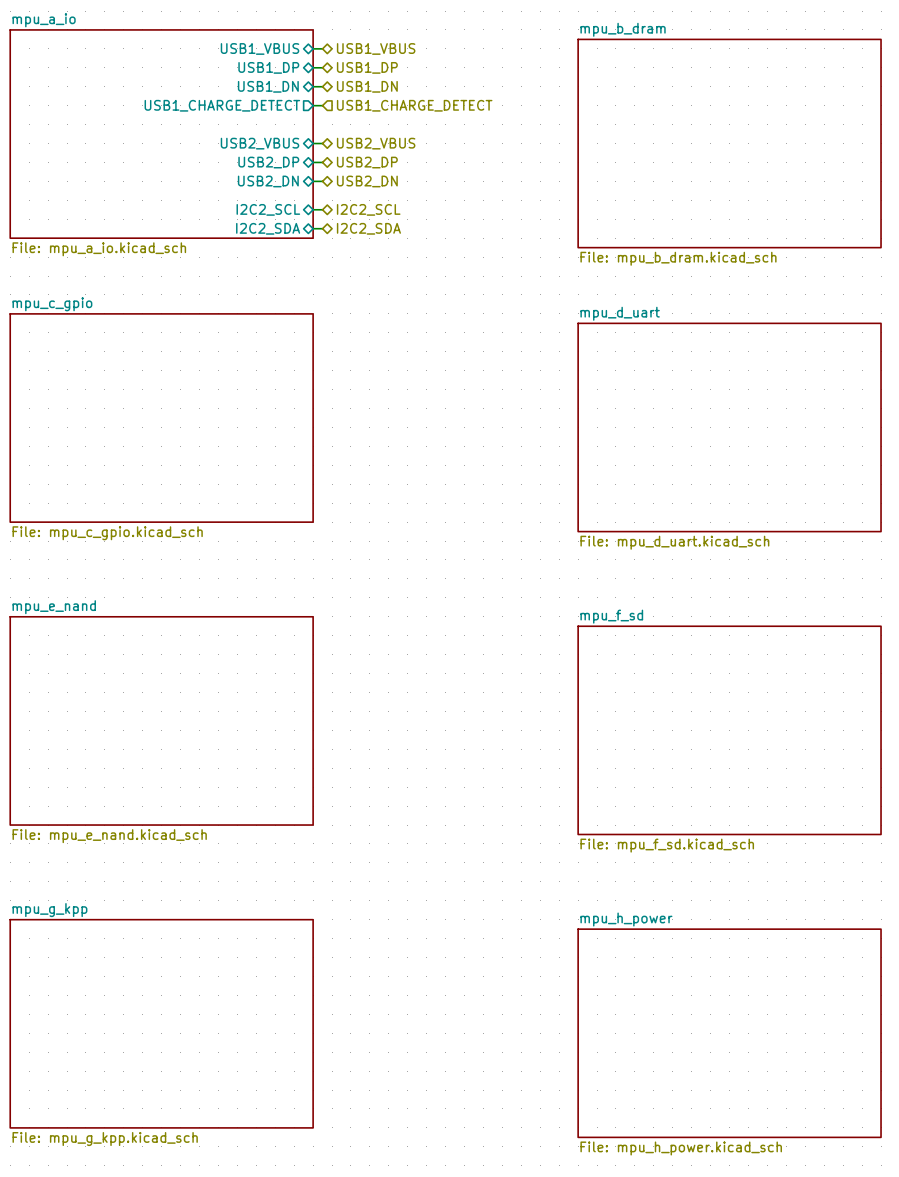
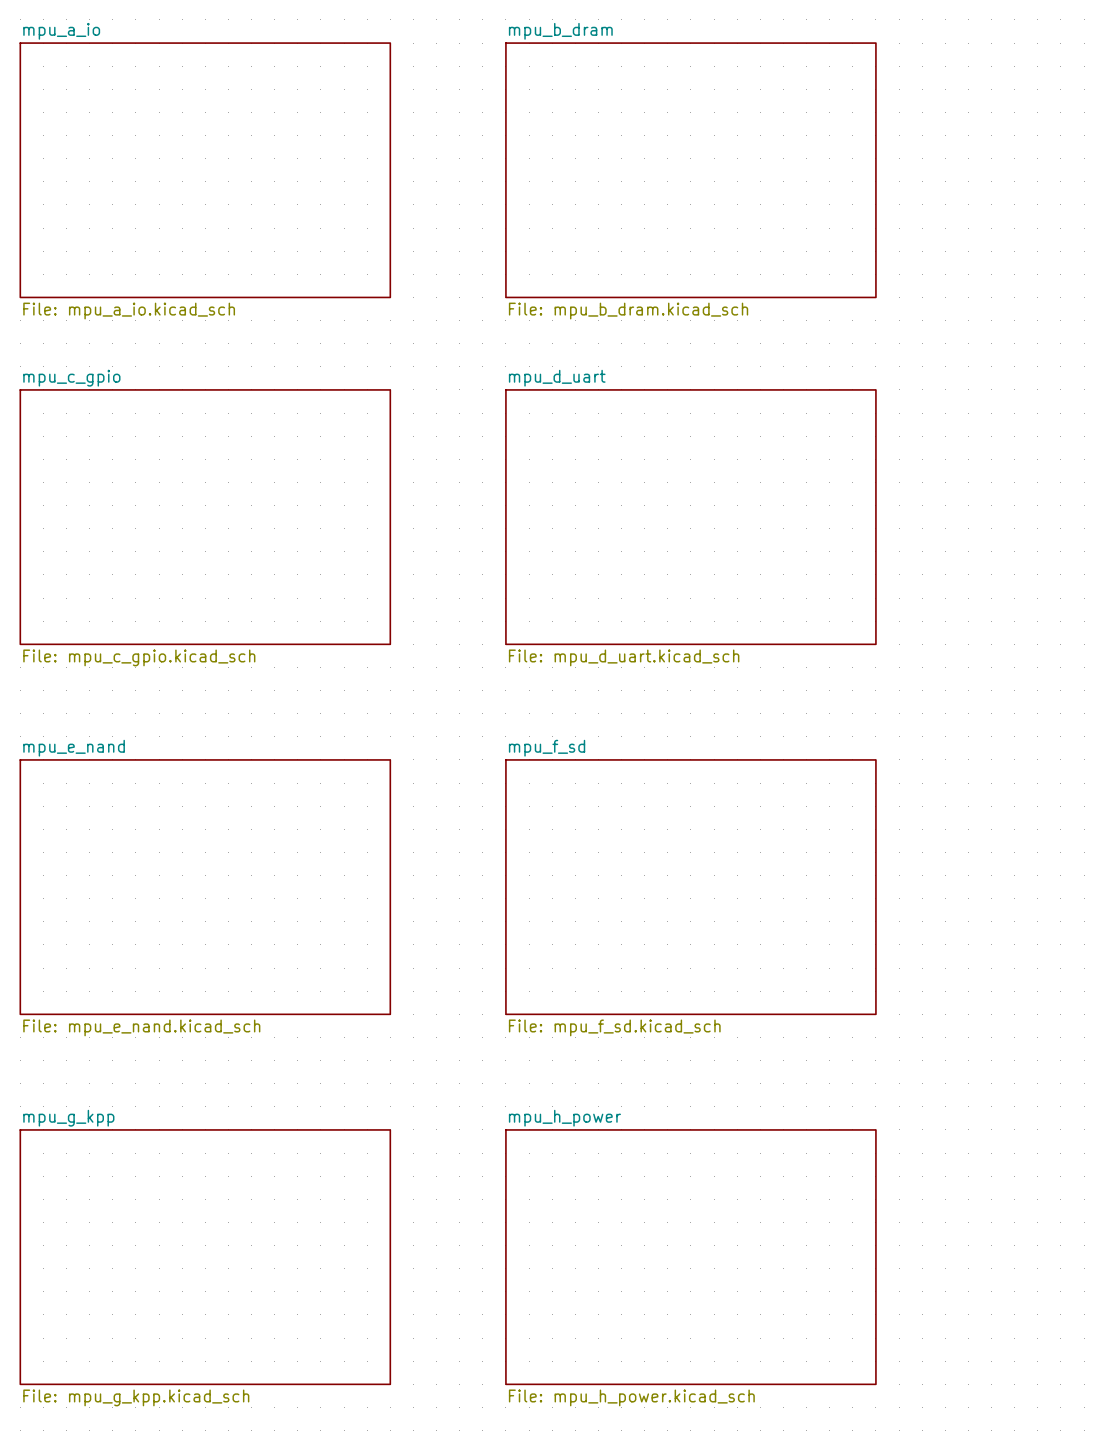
sheet pin: USB1_VBUS (260, 48) -> none
wire: (313, 48) (322, 48) -> none
hierarchical label: USB1_VBUS (376, 48) -> none
sheet pin: USB1_DP (268, 67) -> none
wire: (313, 67) (322, 67) -> none
hierarchical label: USB1_DP (367, 67) -> none
sheet pin: USB1_DN (268, 86) -> none
wire: (313, 86) (322, 86) -> none
hierarchical label: USB1_DN (367, 86) -> none
sheet pin: USB1_CHARGE_DETECT (222, 105) -> none
wire: (313, 105) (322, 105) -> none
hierarchical label: USB1_CHARGE_DETECT (414, 105) -> none
sheet pin: USB2_VBUS (260, 143) -> none
wire: (313, 143) (322, 143) -> none
hierarchical label: USB2_VBUS (376, 143) -> none
sheet mpu_b_dram position: (729, 143) -> (690, 170)
sheet pin: USB2_DP (268, 162) -> none
wire: (313, 162) (322, 162) -> none
hierarchical label: USB2_DP (367, 162) -> none
sheet pin: USB2_DN (268, 181) -> none
wire: (313, 181) (322, 181) -> none
hierarchical label: USB2_DN (367, 181) -> none
sheet pin: I2C2_SCL (268, 209) -> none
wire: (313, 209) (322, 209) -> none
hierarchical label: I2C2_SCL (368, 209) -> none
sheet pin: I2C2_SDA (268, 228) -> none
wire: (313, 228) (322, 228) -> none
hierarchical label: I2C2_SDA (368, 228) -> none
sheet mpu_d_uart position: (729, 427) -> (690, 517)
sheet mpu_f_sd position: (729, 730) -> (690, 887)
sheet mpu_h_power position: (729, 1033) -> (690, 1257)

